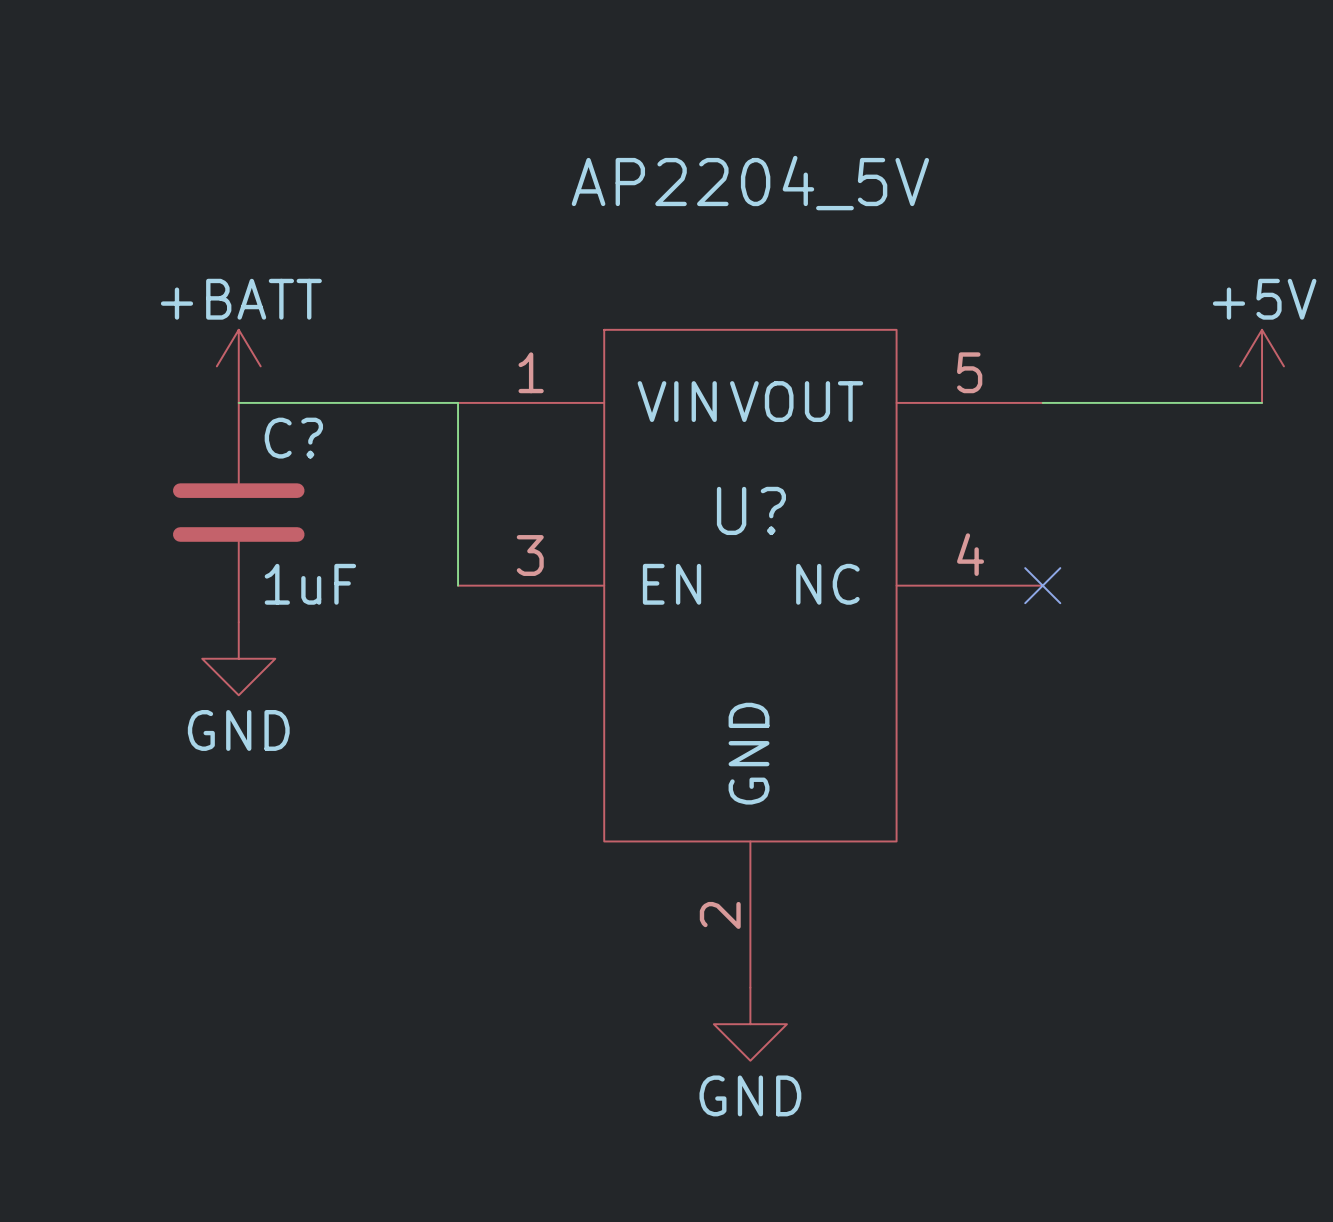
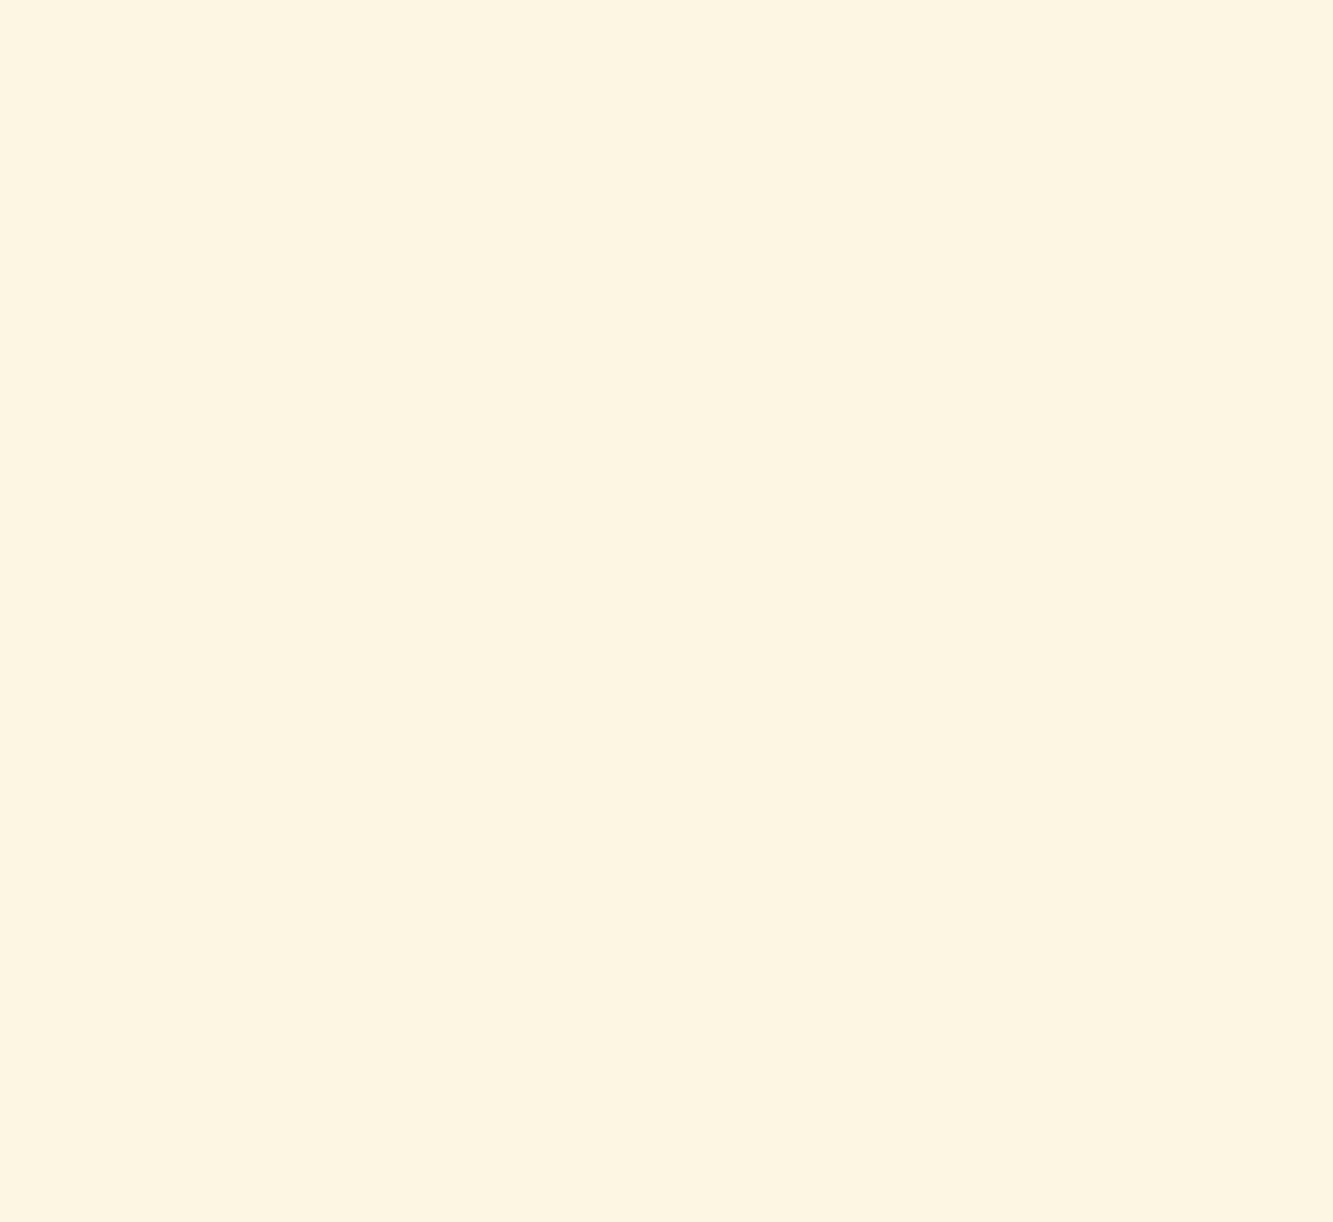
power symbol: +BATT (238, 366) -> none
power symbol: +5V (1262, 366) -> none
wire: (238, 402) (458, 402) (458, 585) -> none
wire: (1042, 402) (1262, 402) -> none
C?: 1uF (238, 512) -> none
no-connect mark: (1042, 585) -> none
power symbol: GND (238, 658) -> none
U?: AP2204_5V (750, 658) -> none
power symbol: GND (750, 1024) -> none

